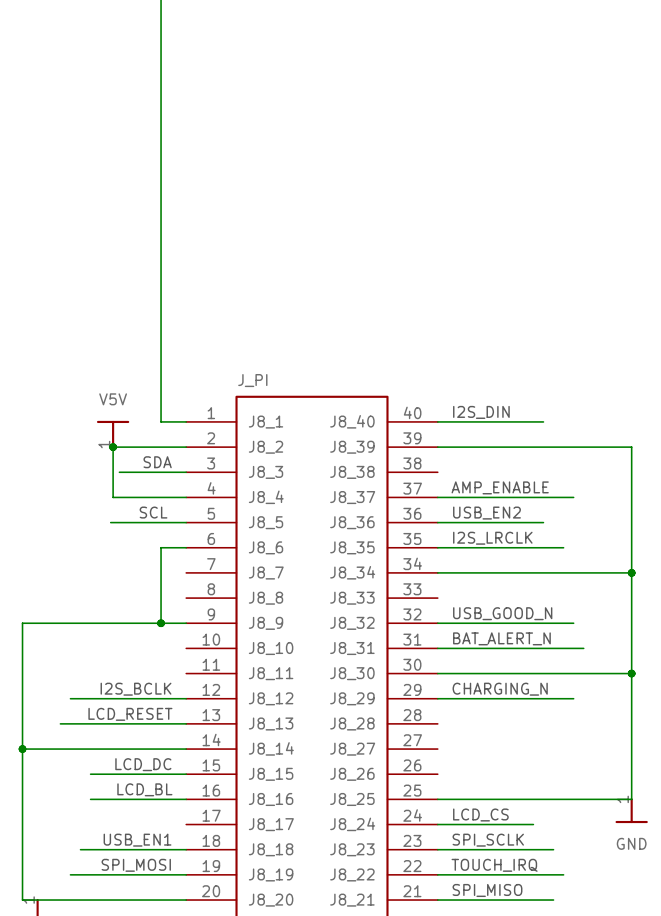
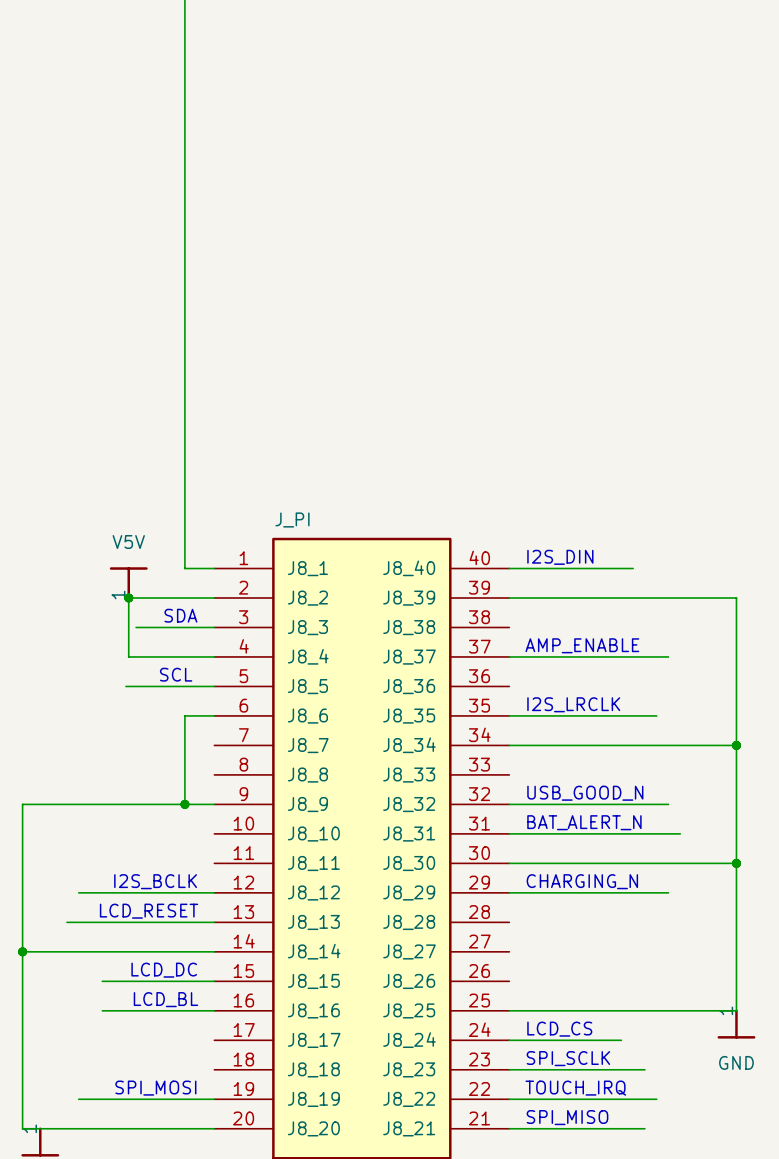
text: USB_EN2 (486, 513) -> none
wire: (437, 522) (543, 522) -> none
text: USB_EN1 (137, 840) -> none
wire: (80, 849) (186, 849) -> none

